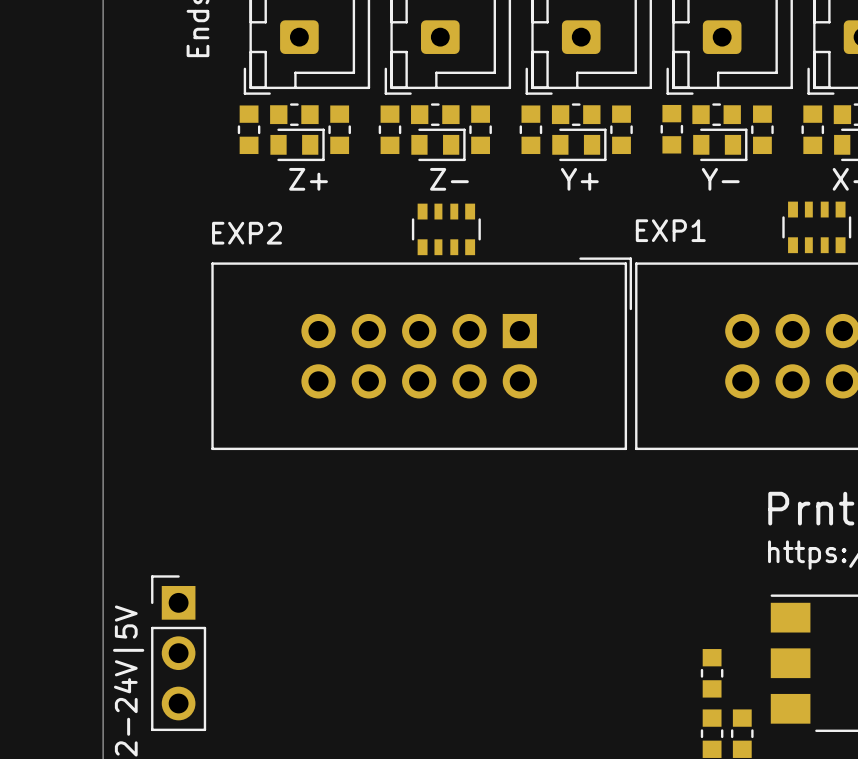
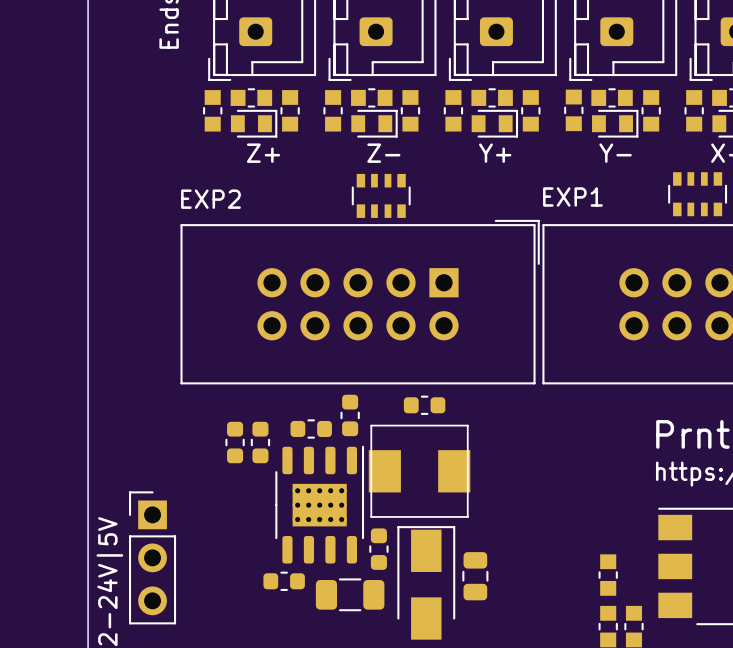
part: none -> (424, 405)
part: none -> (350, 415)
part: none -> (311, 428)
part: none -> (235, 442)
part: none -> (260, 442)
part: none -> (419, 471)
part: none -> (319, 504)
part: none -> (378, 549)
part: none -> (475, 576)
part: none -> (284, 581)
part: none -> (426, 582)
part: none -> (350, 594)

